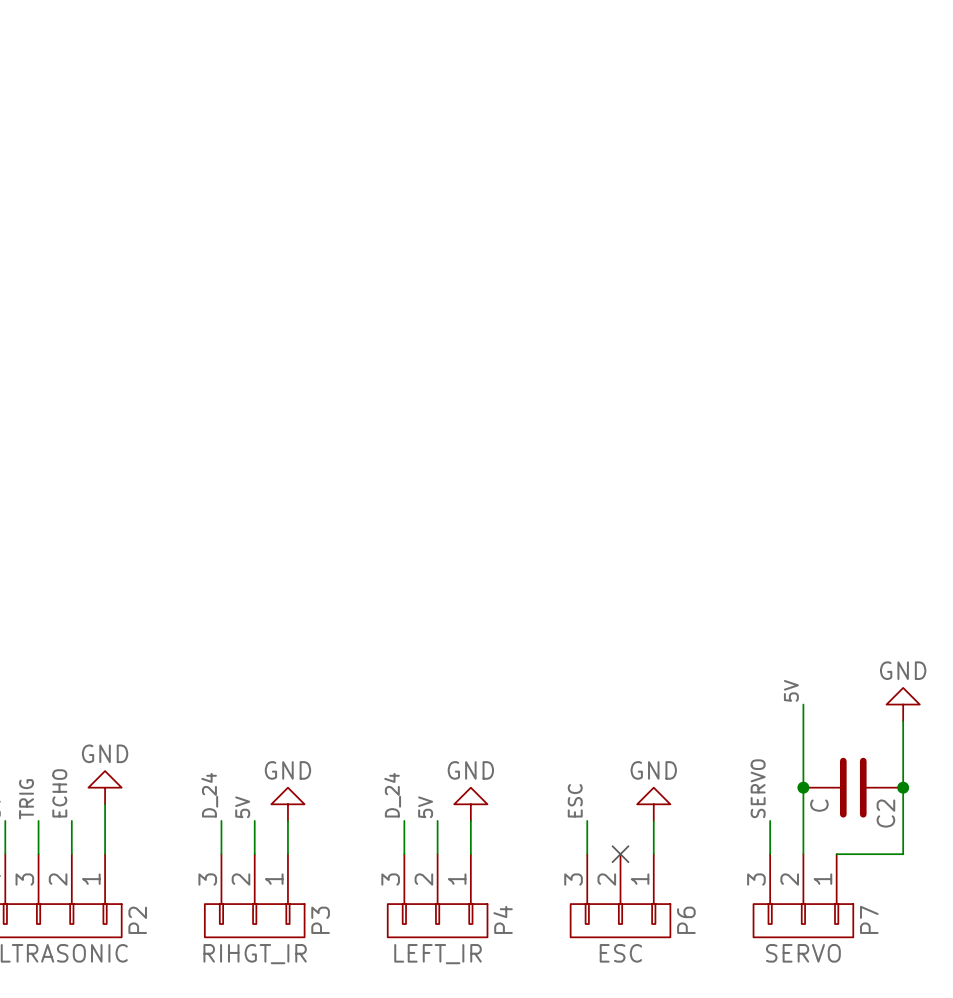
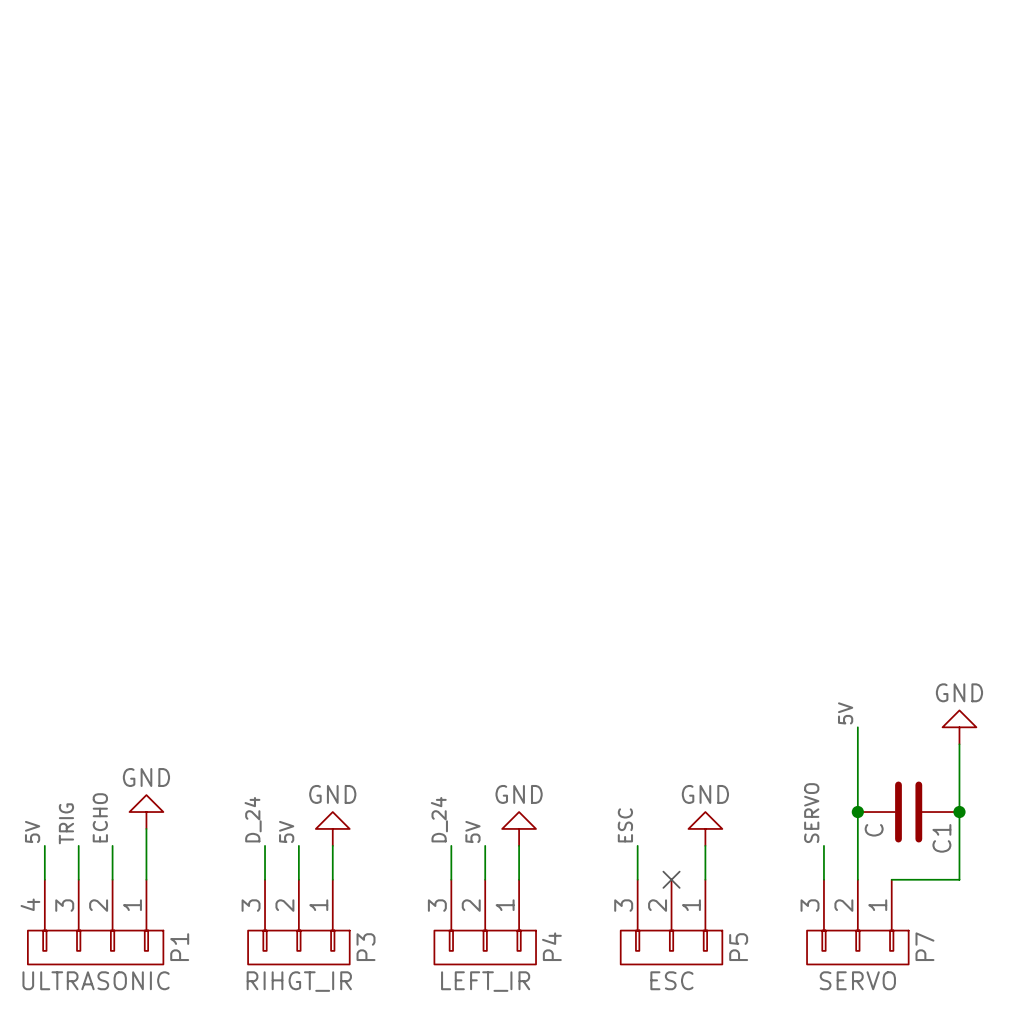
C2 name: C2 (885, 813) -> C1 (941, 838)
P2 name: P2 (137, 920) -> P1 (179, 947)
P6 name: P6 (686, 920) -> P5 (738, 947)

